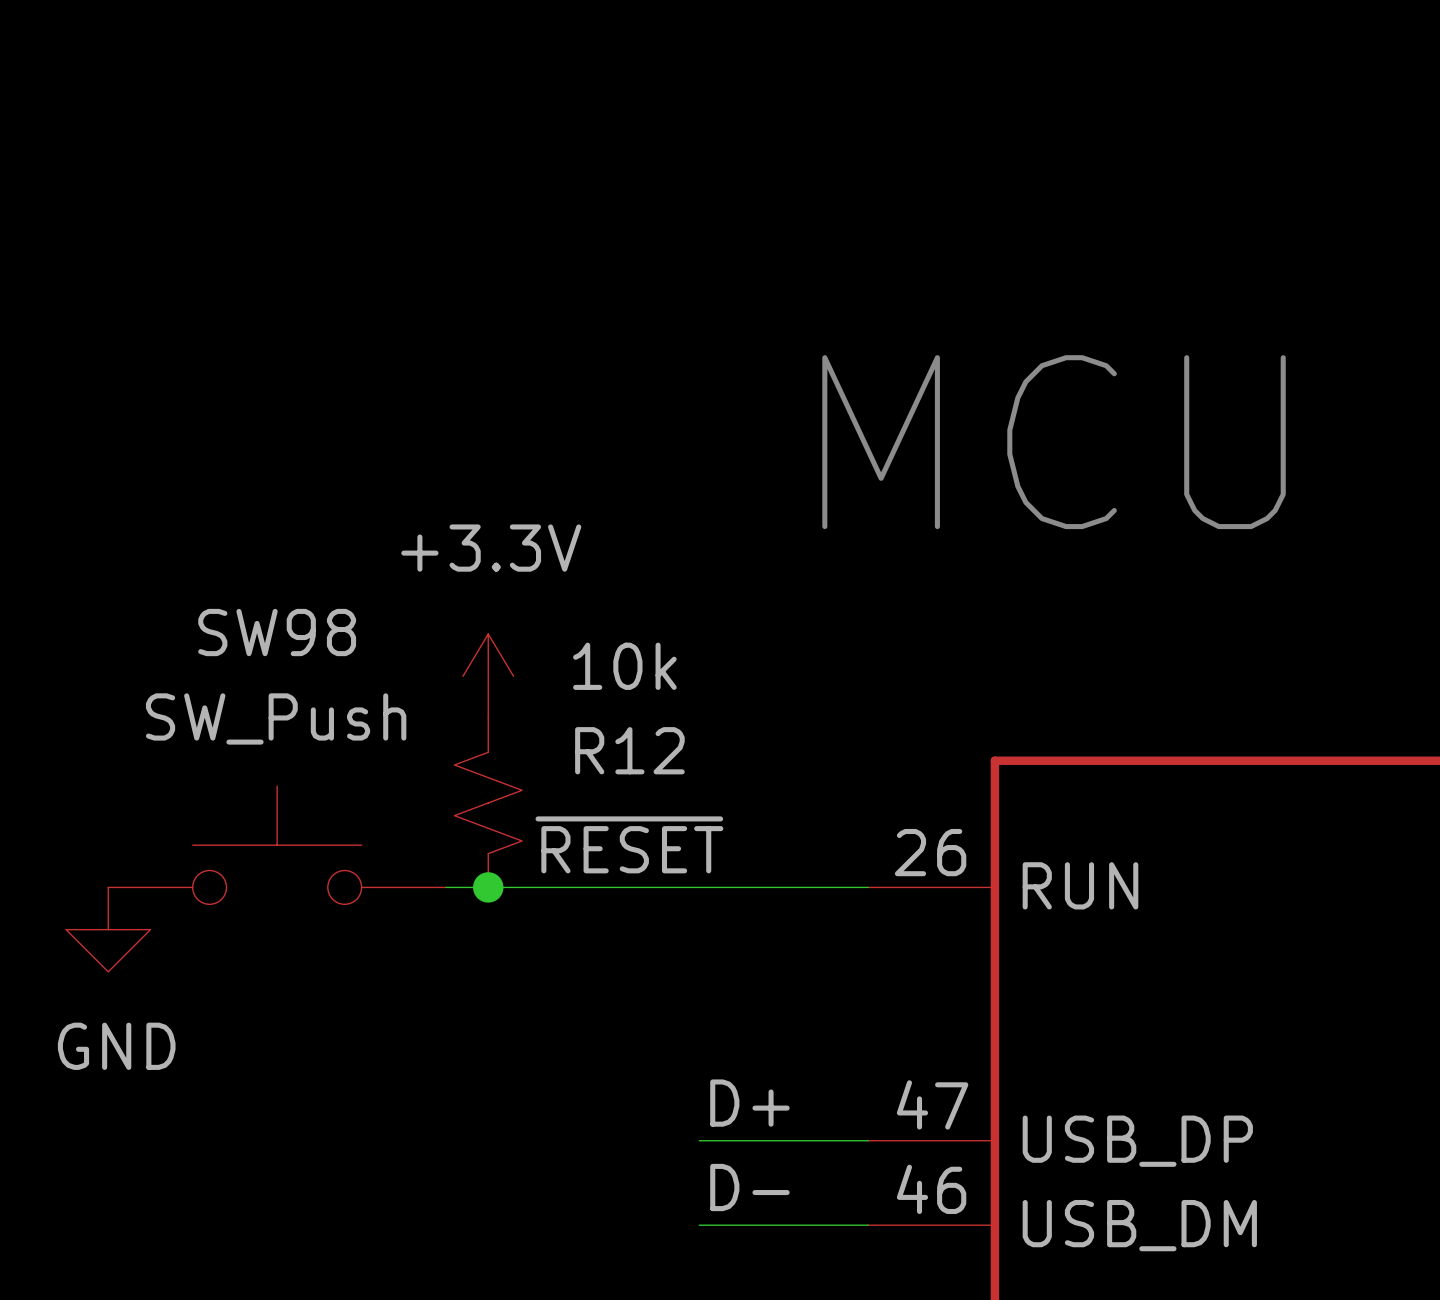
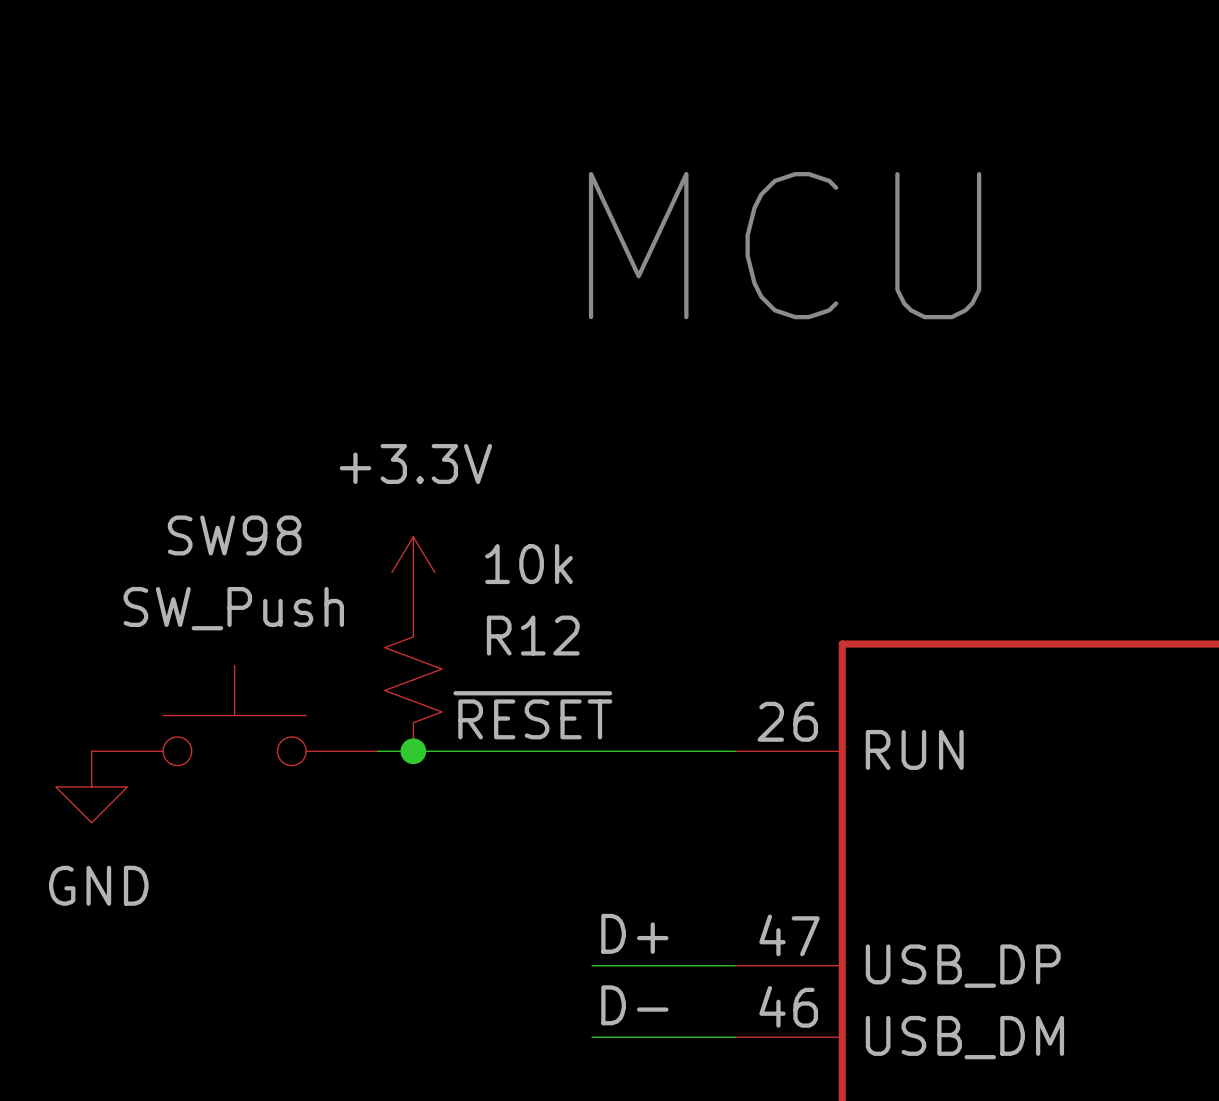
text position: MCU (1054, 442) -> MCU (785, 245)

